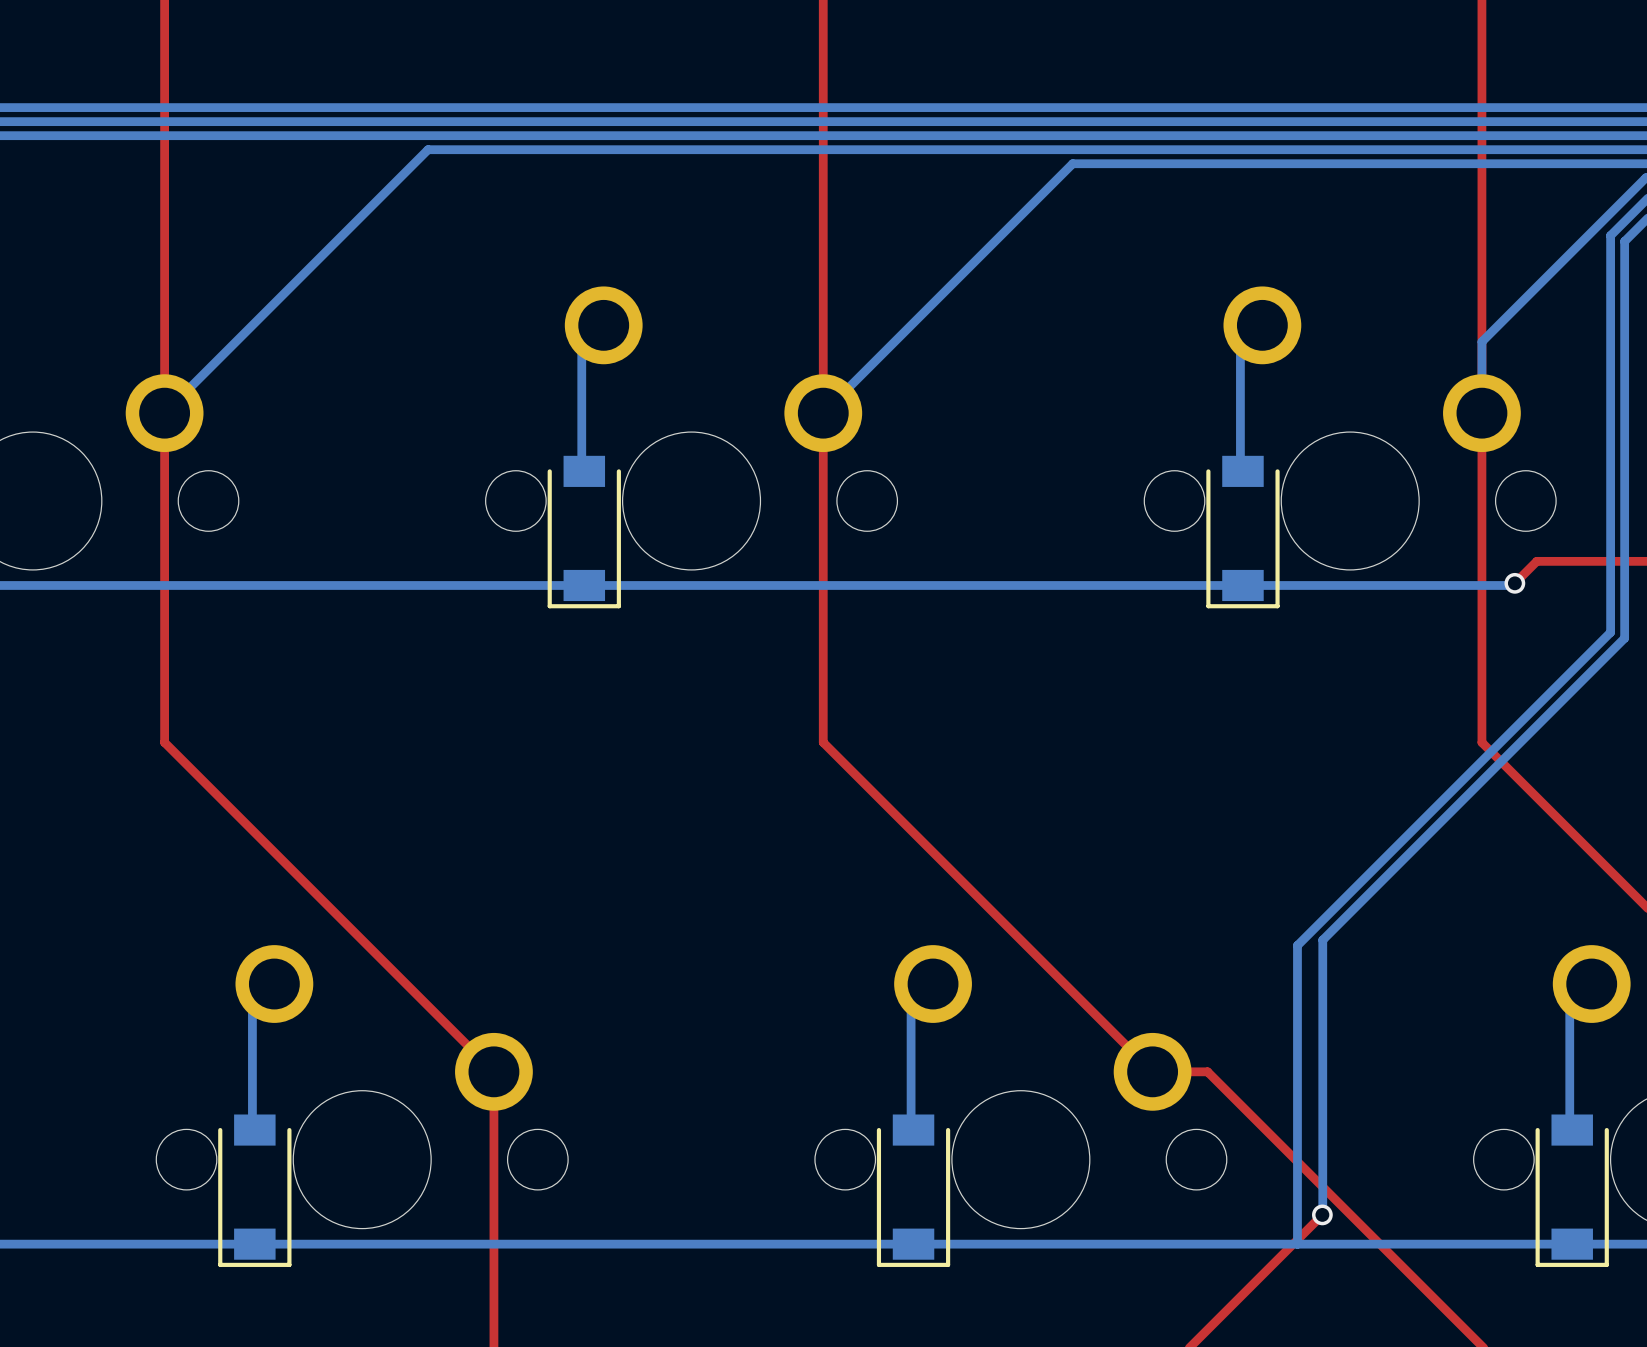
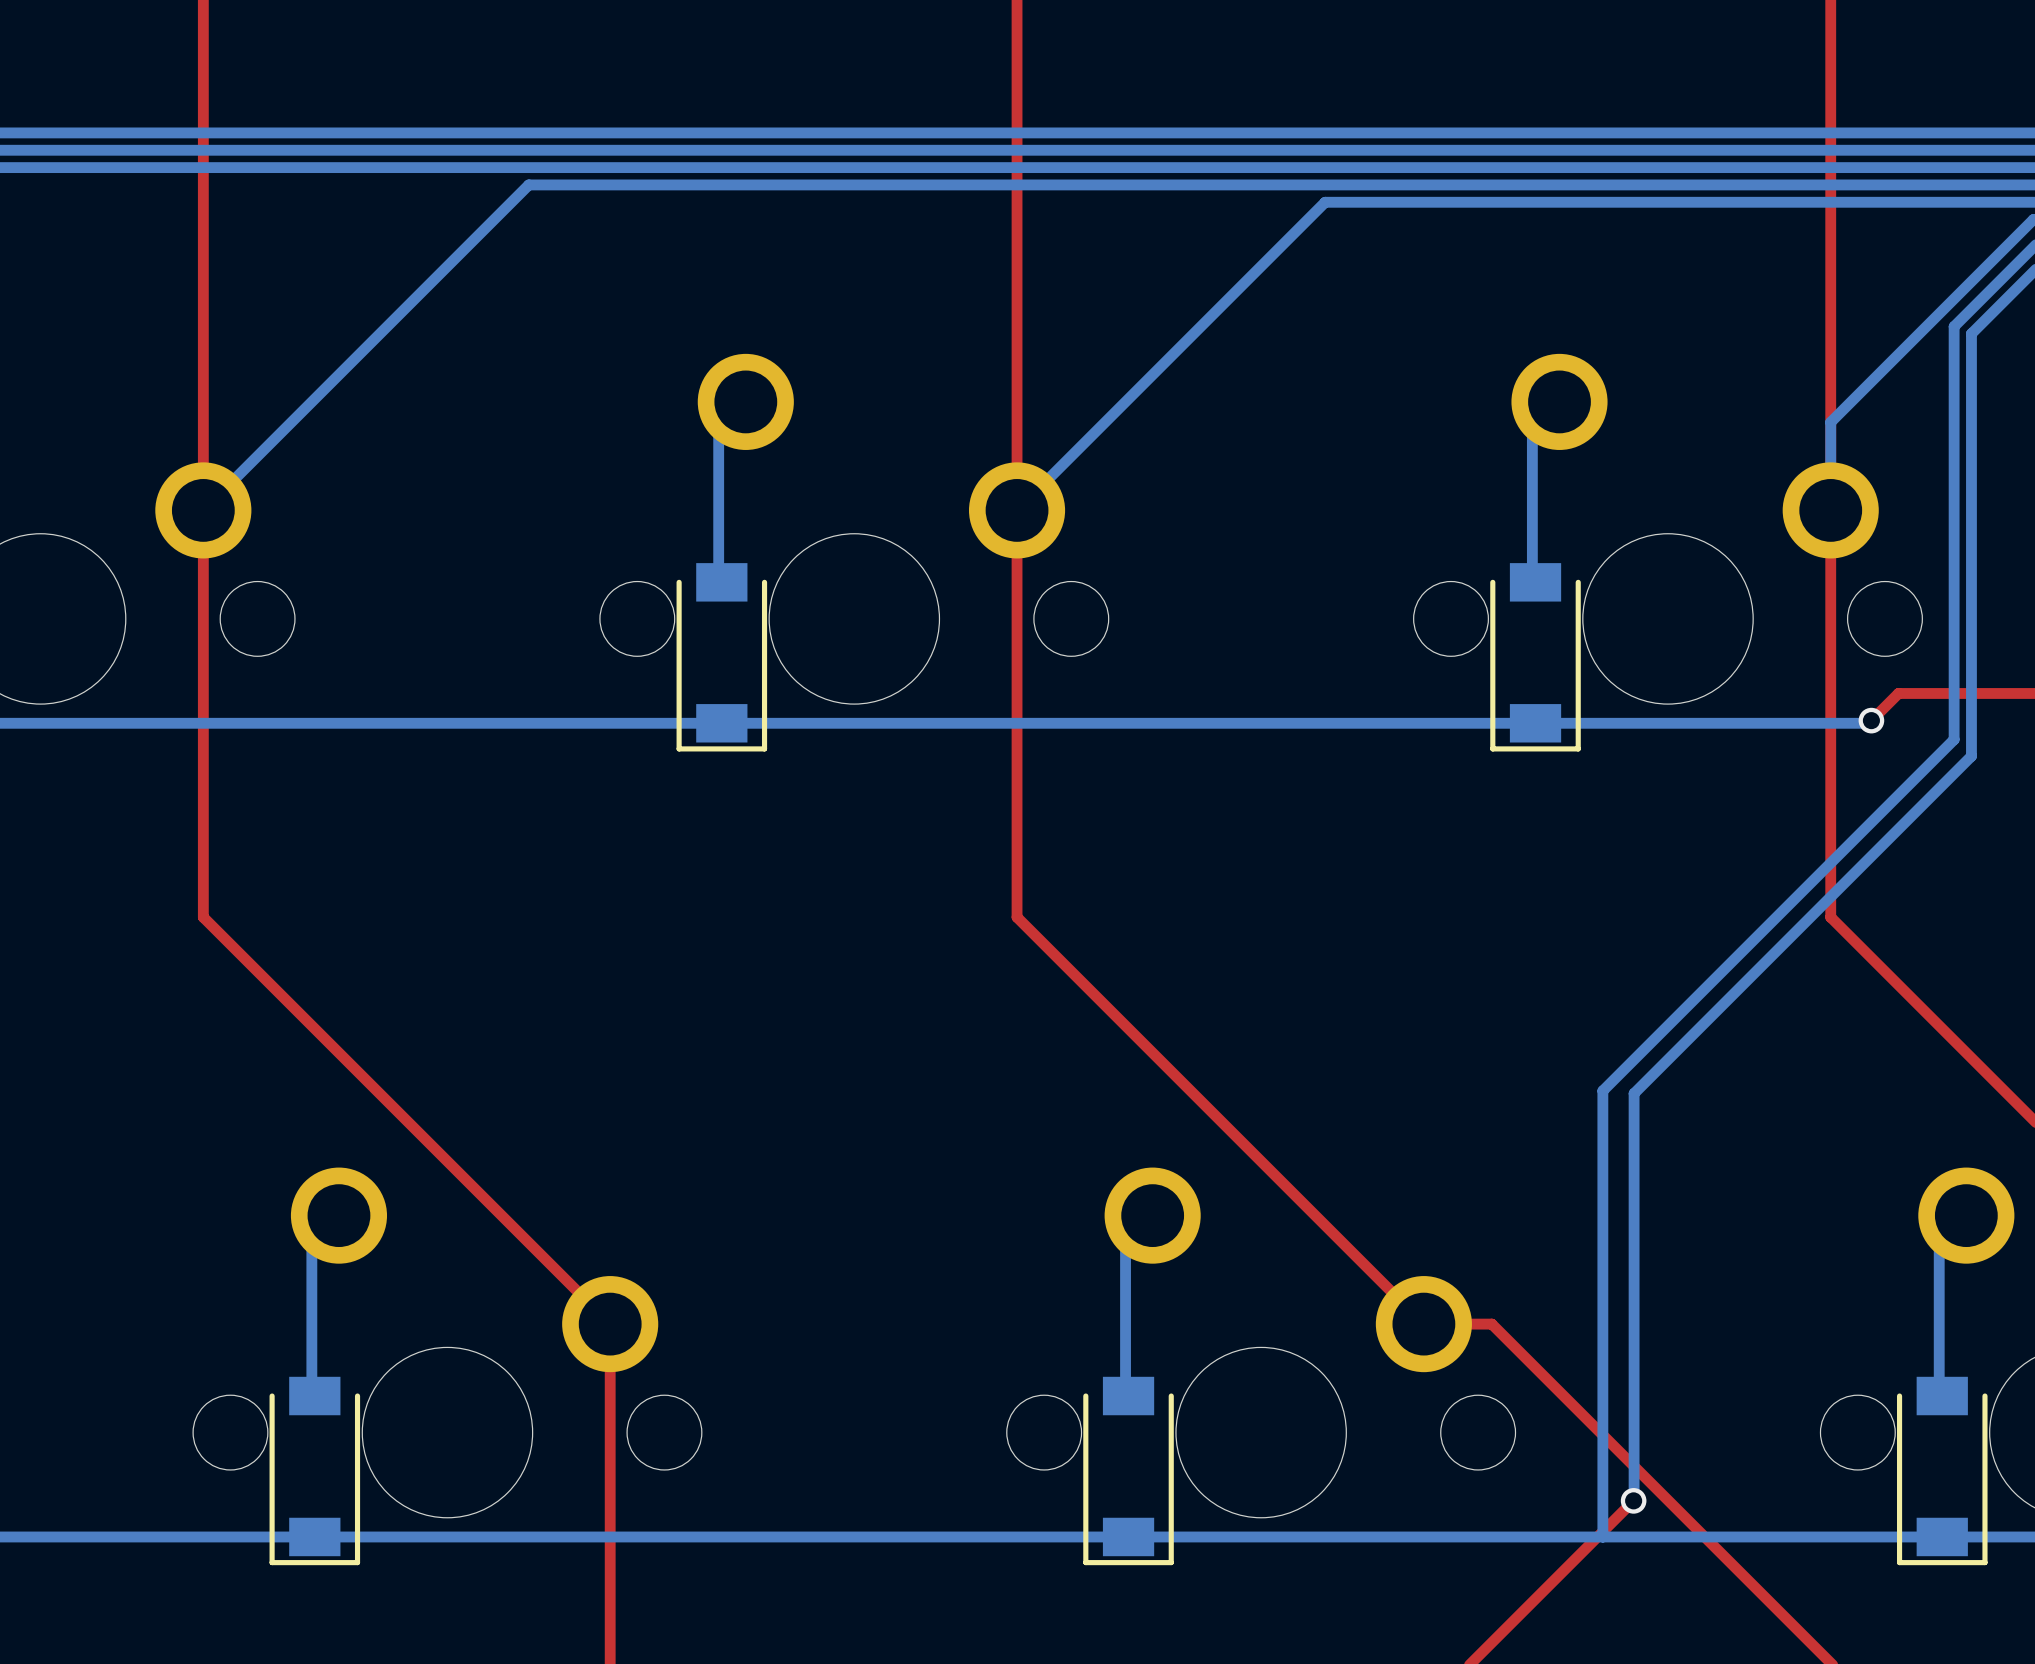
bottom track: (1610, 235) (1610, 632) (1297, 945) -> (1989, 291) (1954, 326) (1954, 739) (1602, 1090) (1602, 1168)
bottom track: (1624, 241) (1624, 638) (1322, 940) -> (2007, 298) (1971, 333) (1971, 756) (1634, 1093) (1634, 1161)

